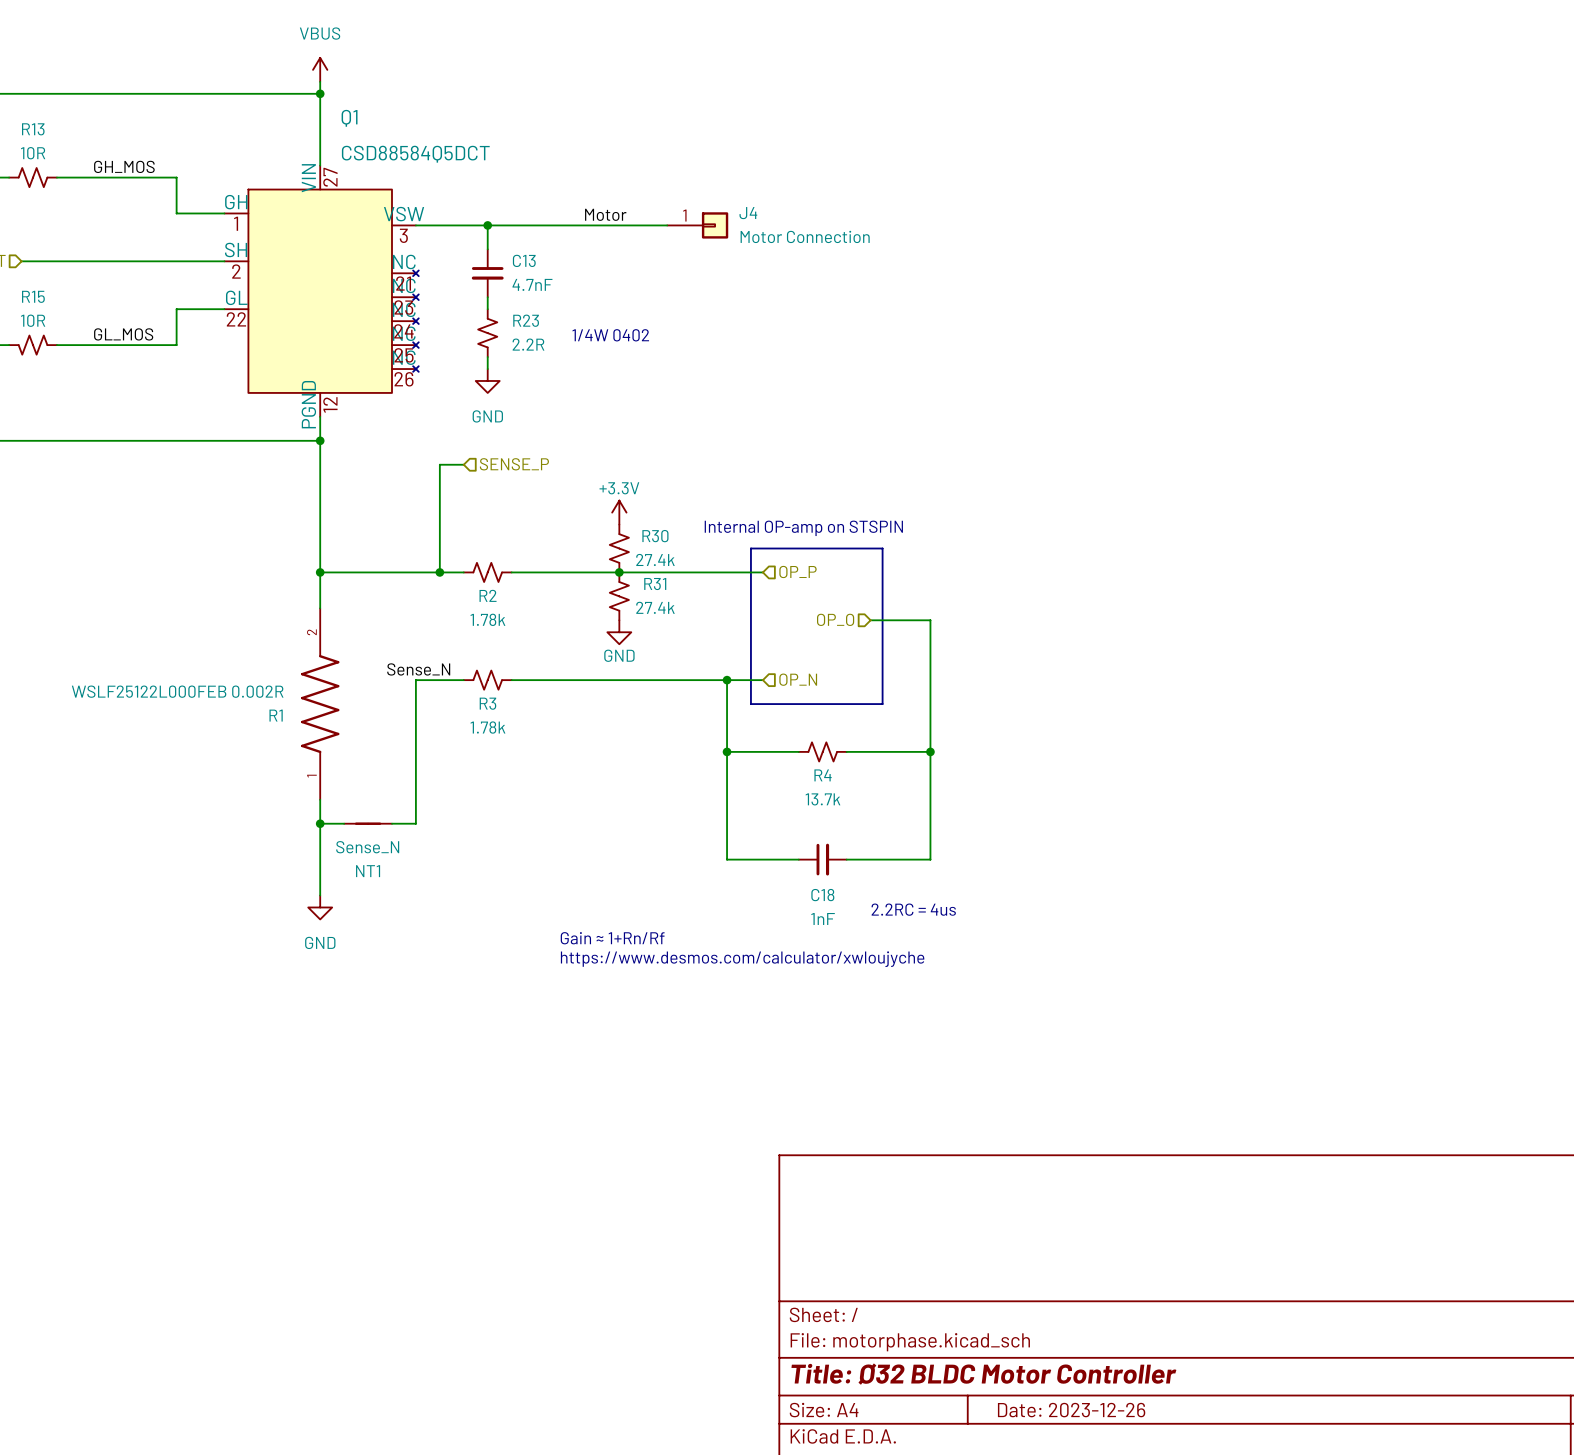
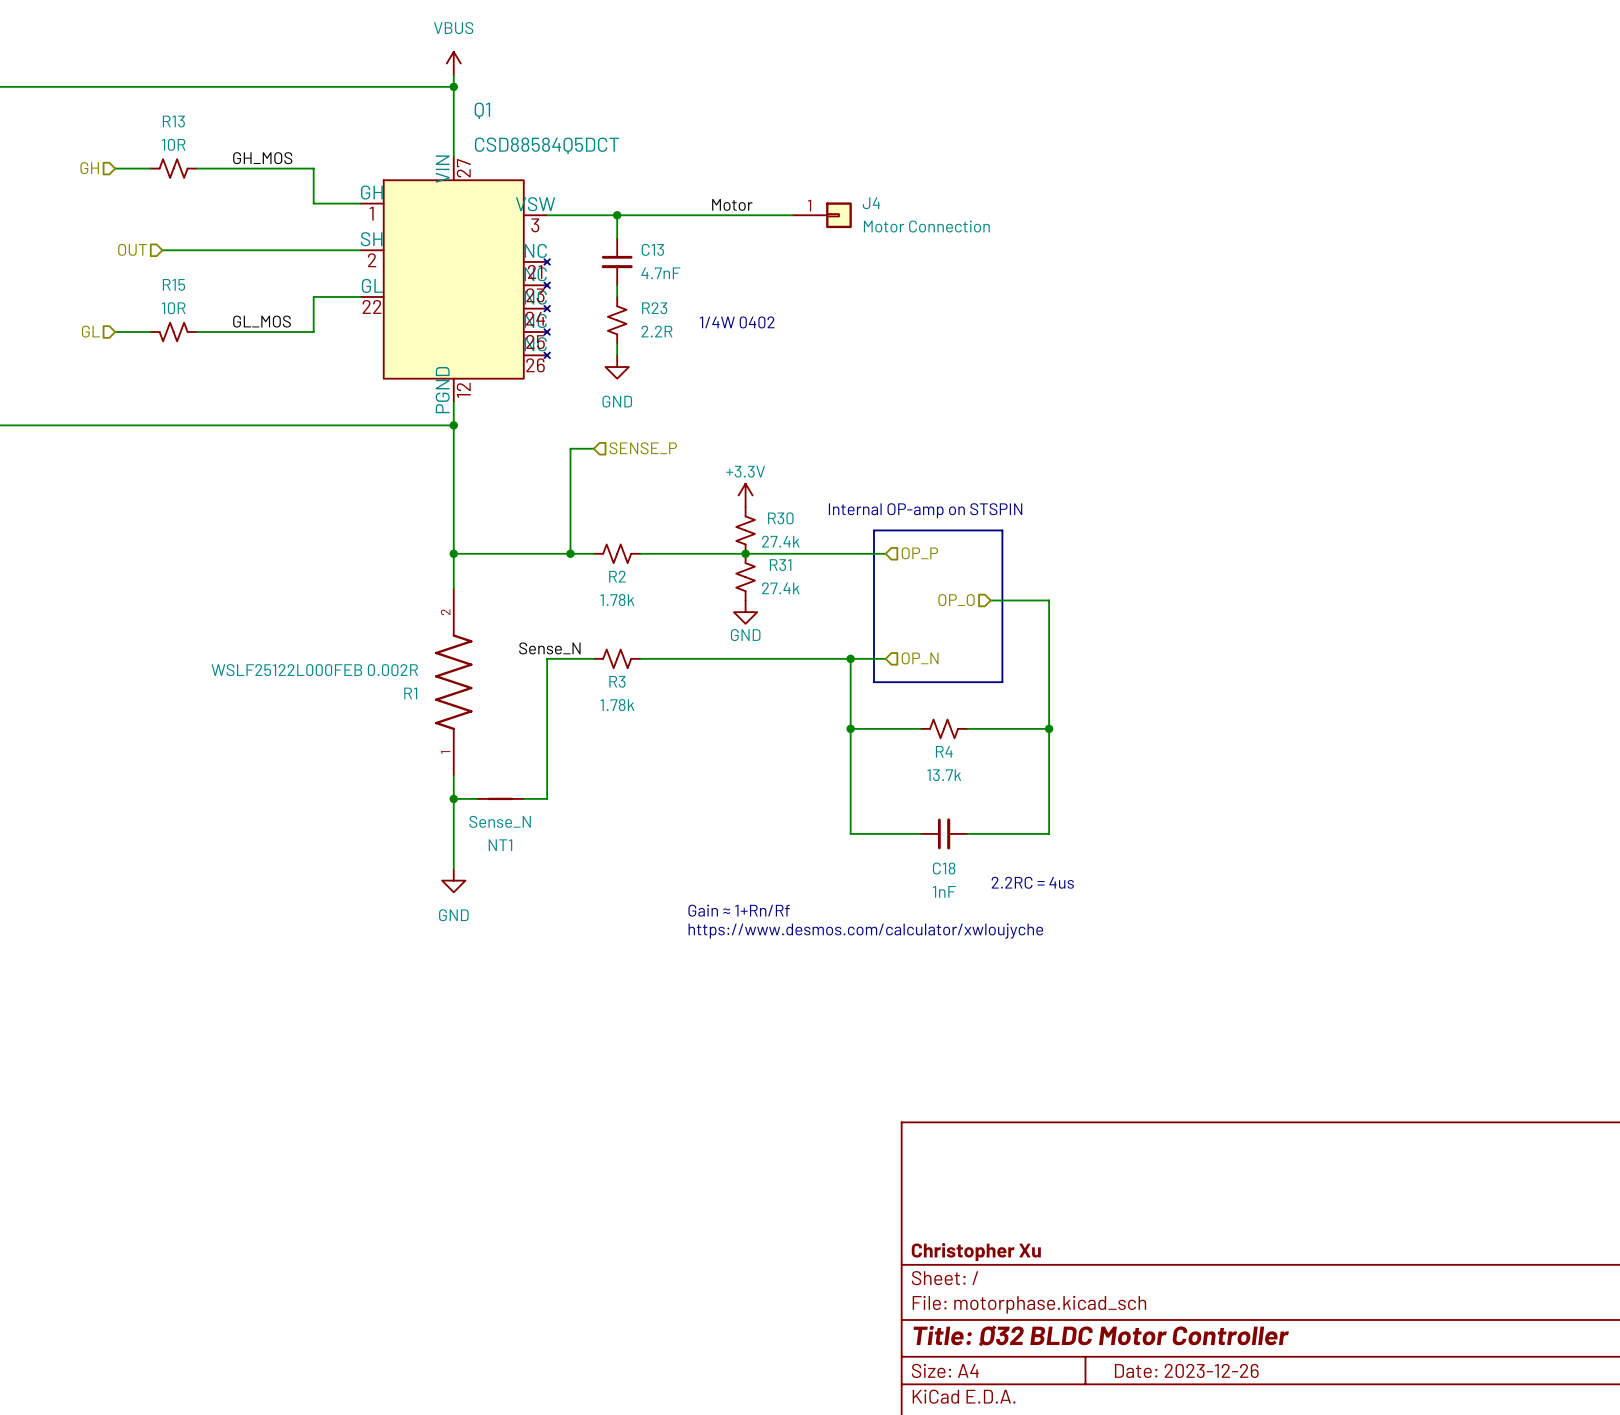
title block: none -> Christopher Xu (976, 1252)

